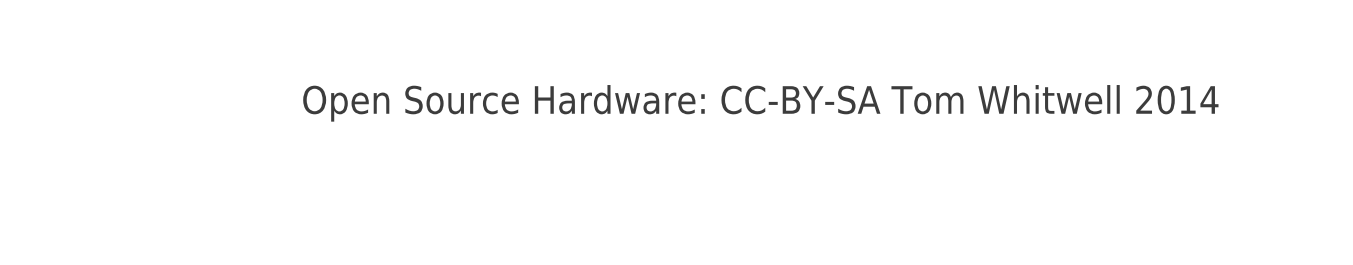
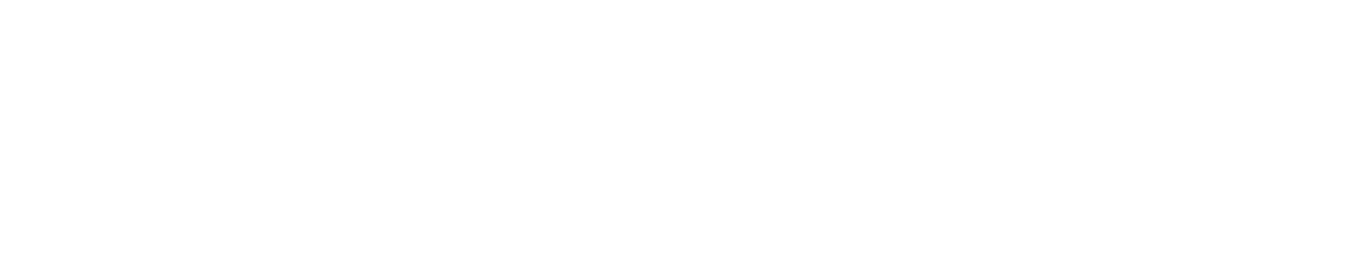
text: Open Source Hardware: CC-BY-SA Tom Whitwell 2014 (760, 103) -> none

